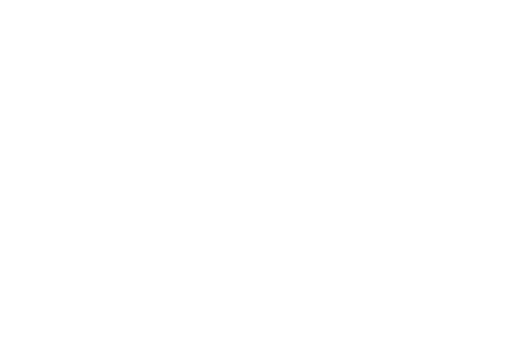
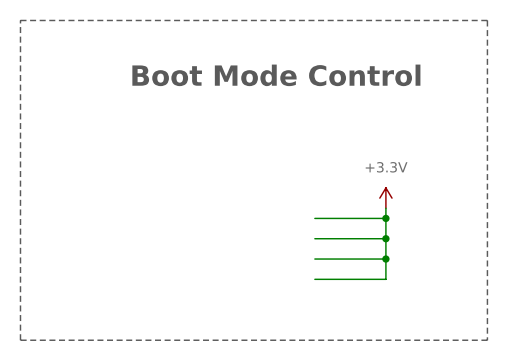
line: none -> (20, 20) (487, 20) (487, 340) (20, 340) (20, 20)
text: none -> Boot Mode Control (276, 75)
power symbol: none -> +3.3V (385, 198)
wire: none -> (385, 208) (385, 279) (314, 279)
wire: none -> (314, 218) (385, 218)
junction: none -> (385, 218)
wire: none -> (314, 238) (385, 238)
junction: none -> (385, 238)
wire: none -> (314, 259) (385, 259)
junction: none -> (385, 259)

